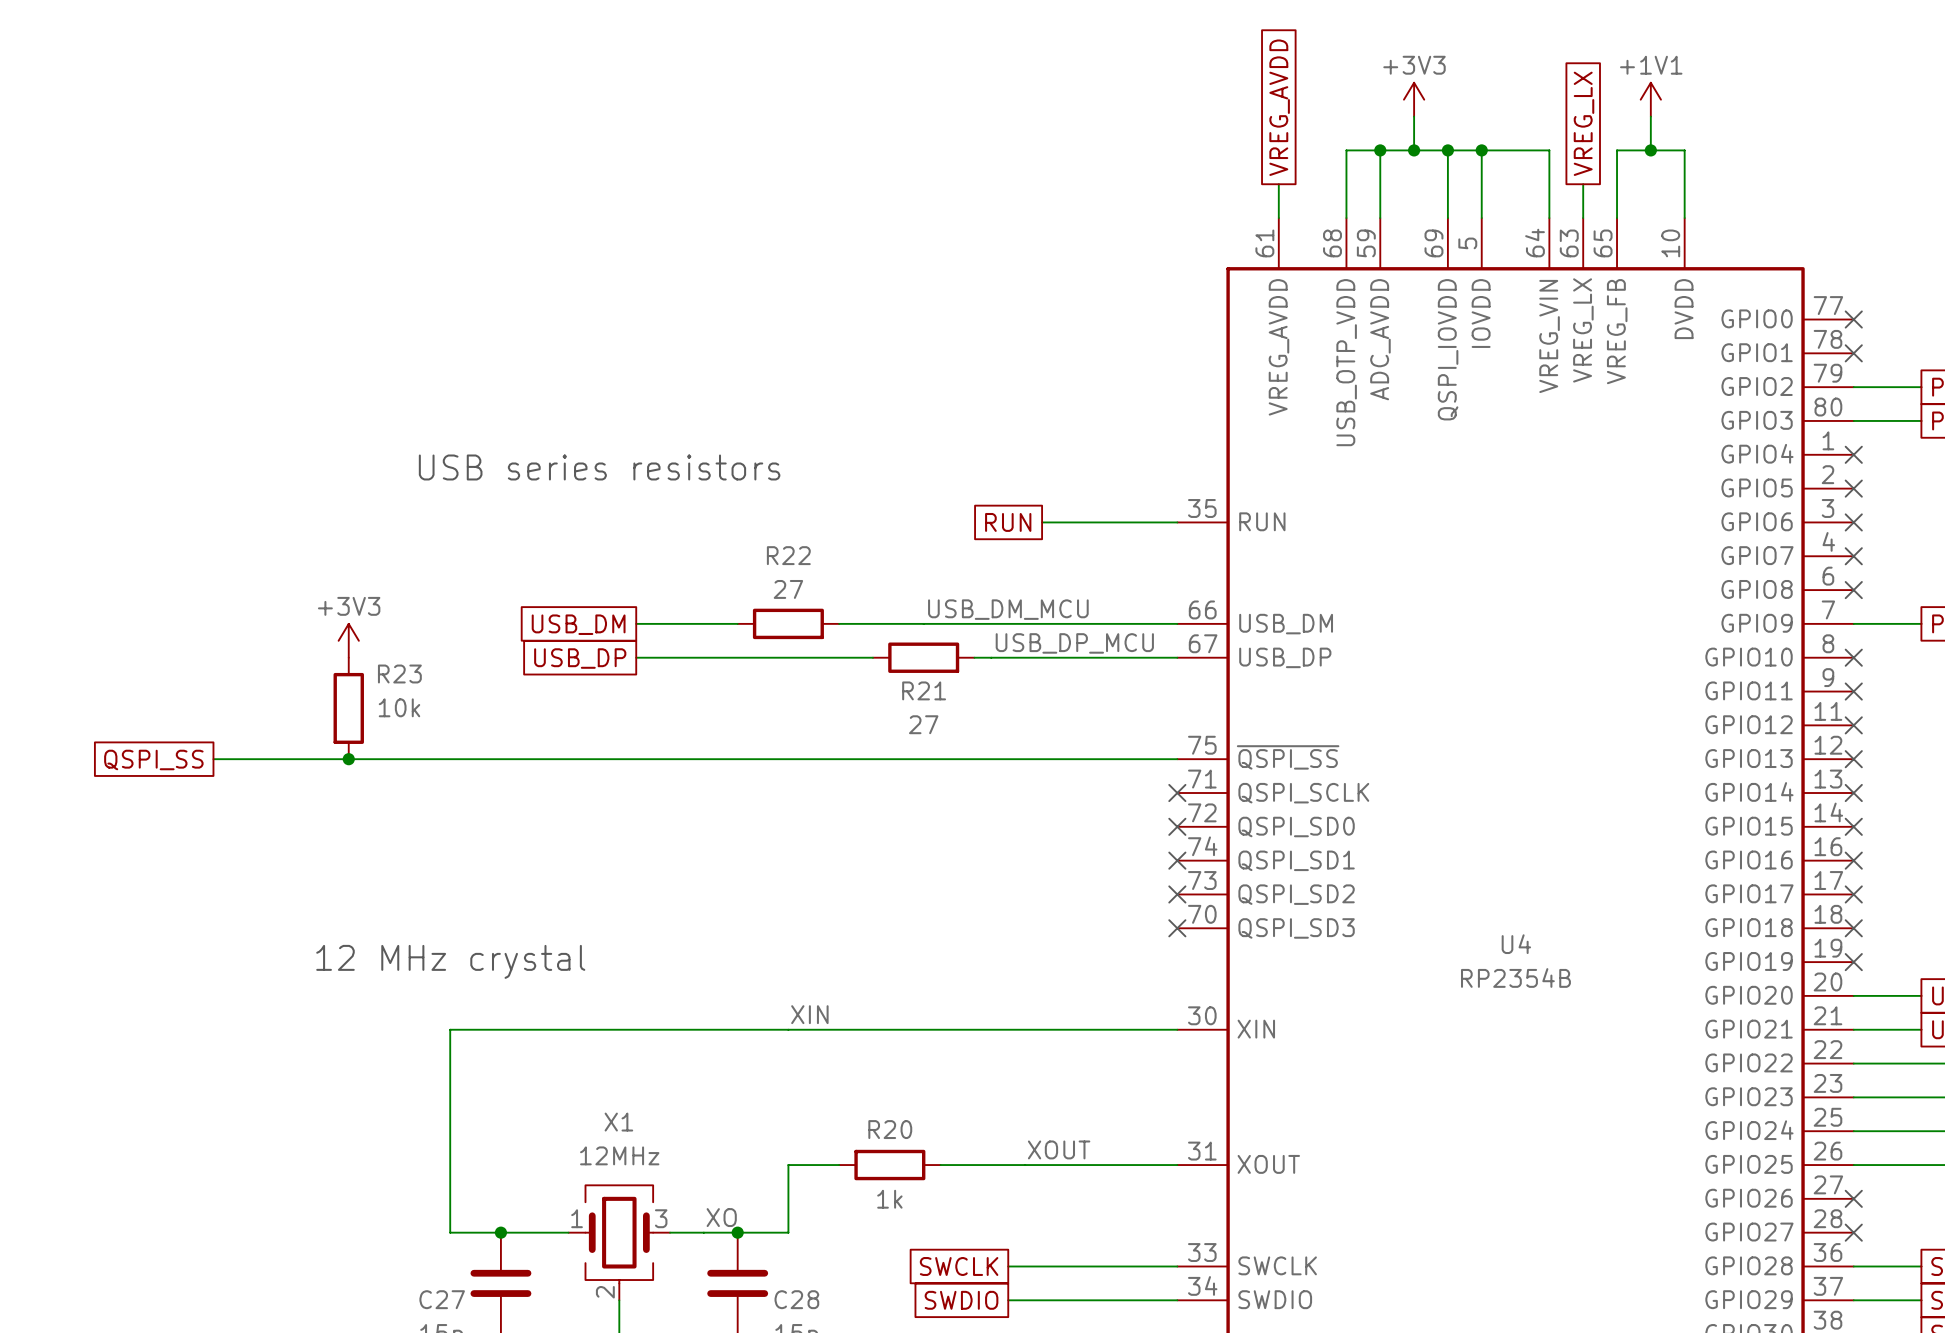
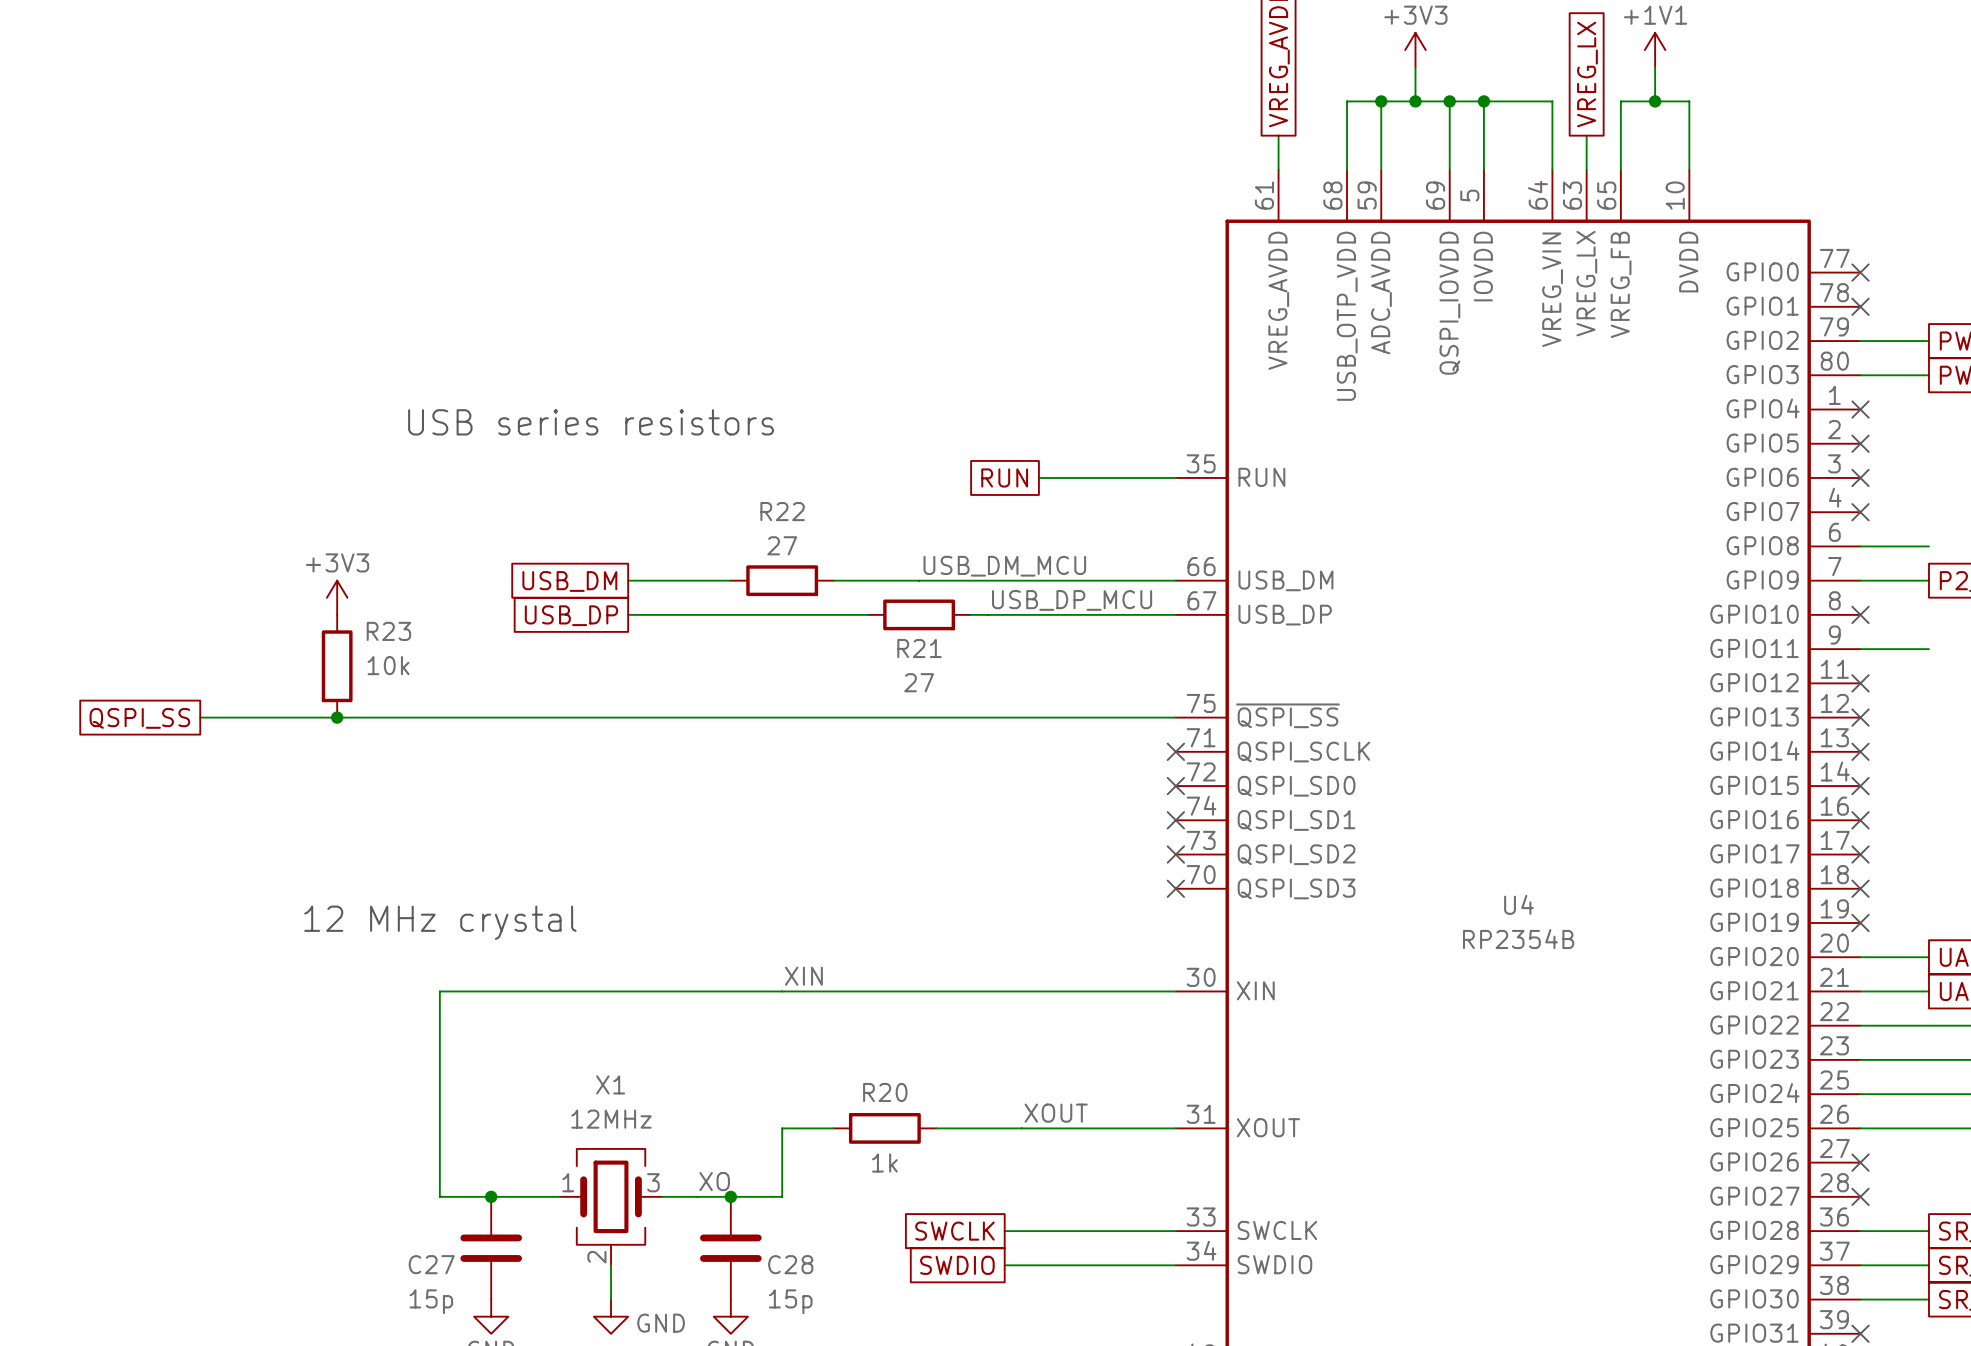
wire: none -> (1860, 546) (1928, 546)
no-connect mark: (1853, 590) -> none
wire: none -> (1860, 649) (1928, 649)
no-connect mark: (1853, 691) -> none

